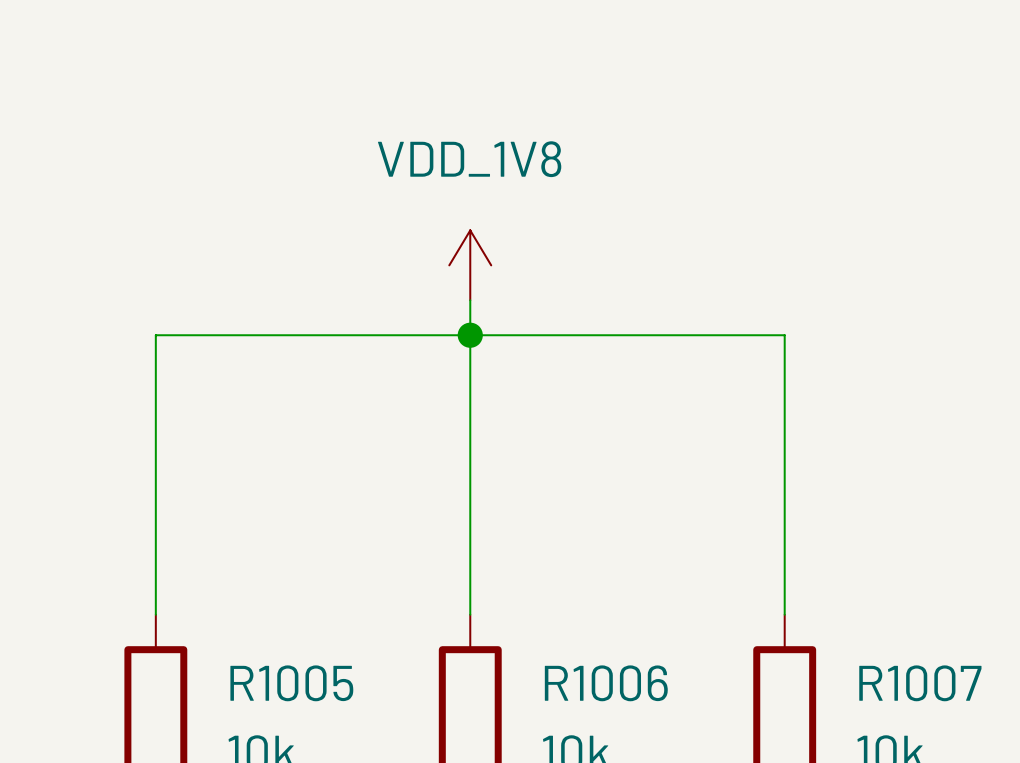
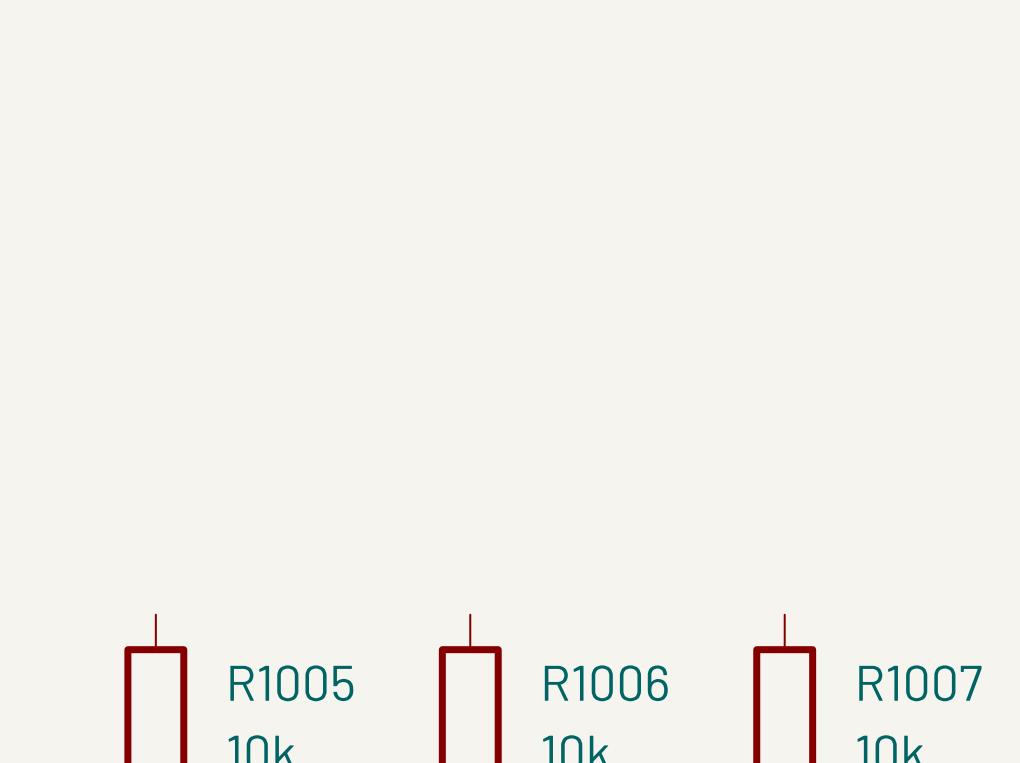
power symbol: VDD_1V8 (470, 265) -> none
wire: (470, 300) (470, 614) -> none
junction: (470, 335) -> none
wire: (155, 614) (155, 335) (784, 335) (784, 614) -> none

